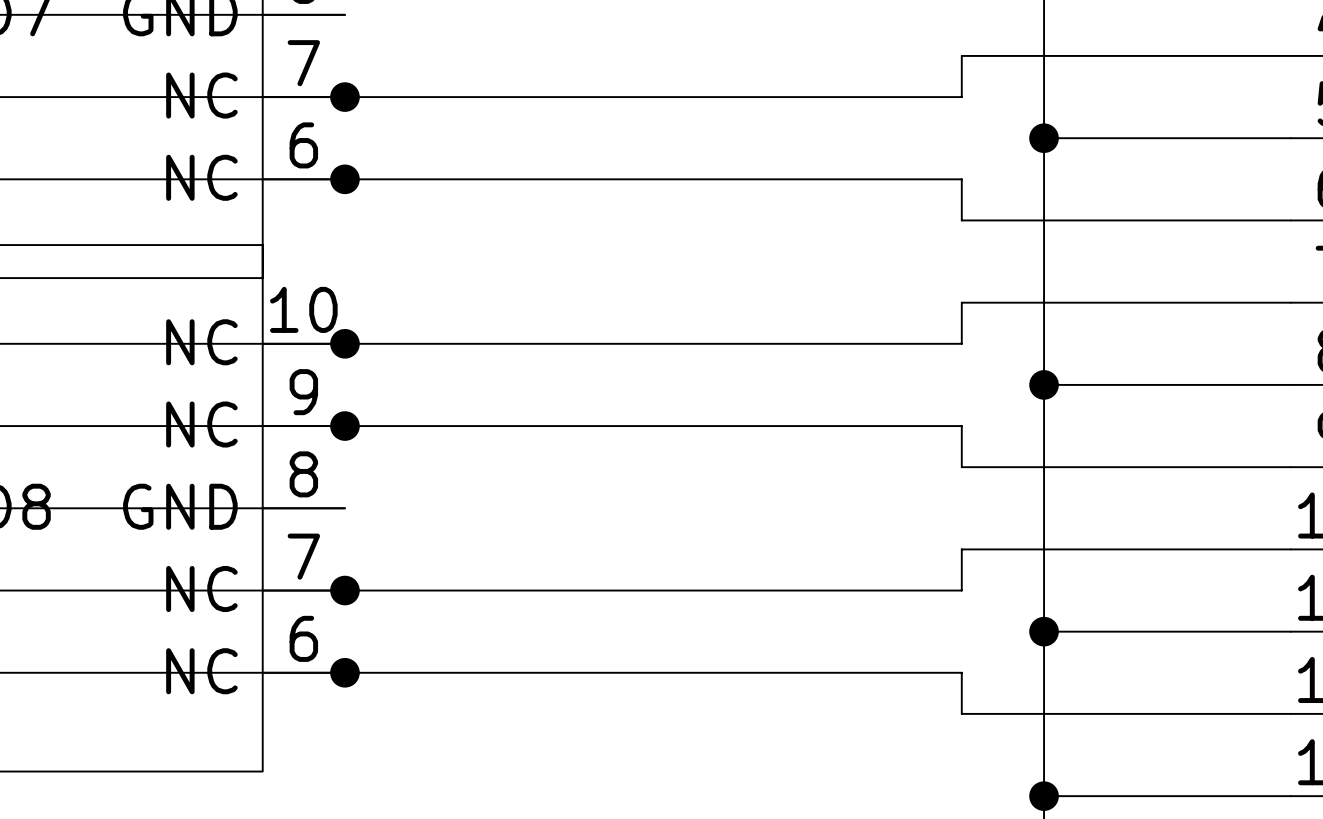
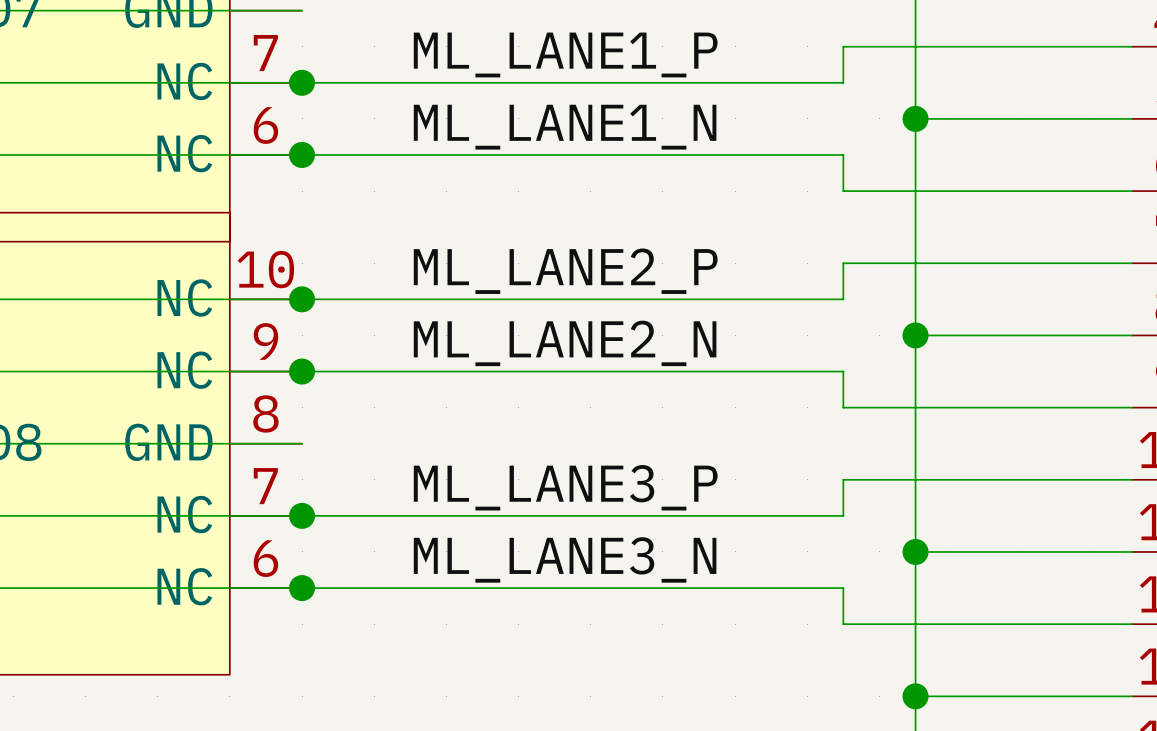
label: none -> ML_LANE1_P (565, 54)
label: none -> ML_LANE1_N (565, 127)
label: none -> ML_LANE2_P (565, 271)
label: none -> ML_LANE2_N (565, 343)
label: none -> ML_LANE3_P (565, 487)
label: none -> ML_LANE3_N (565, 559)

